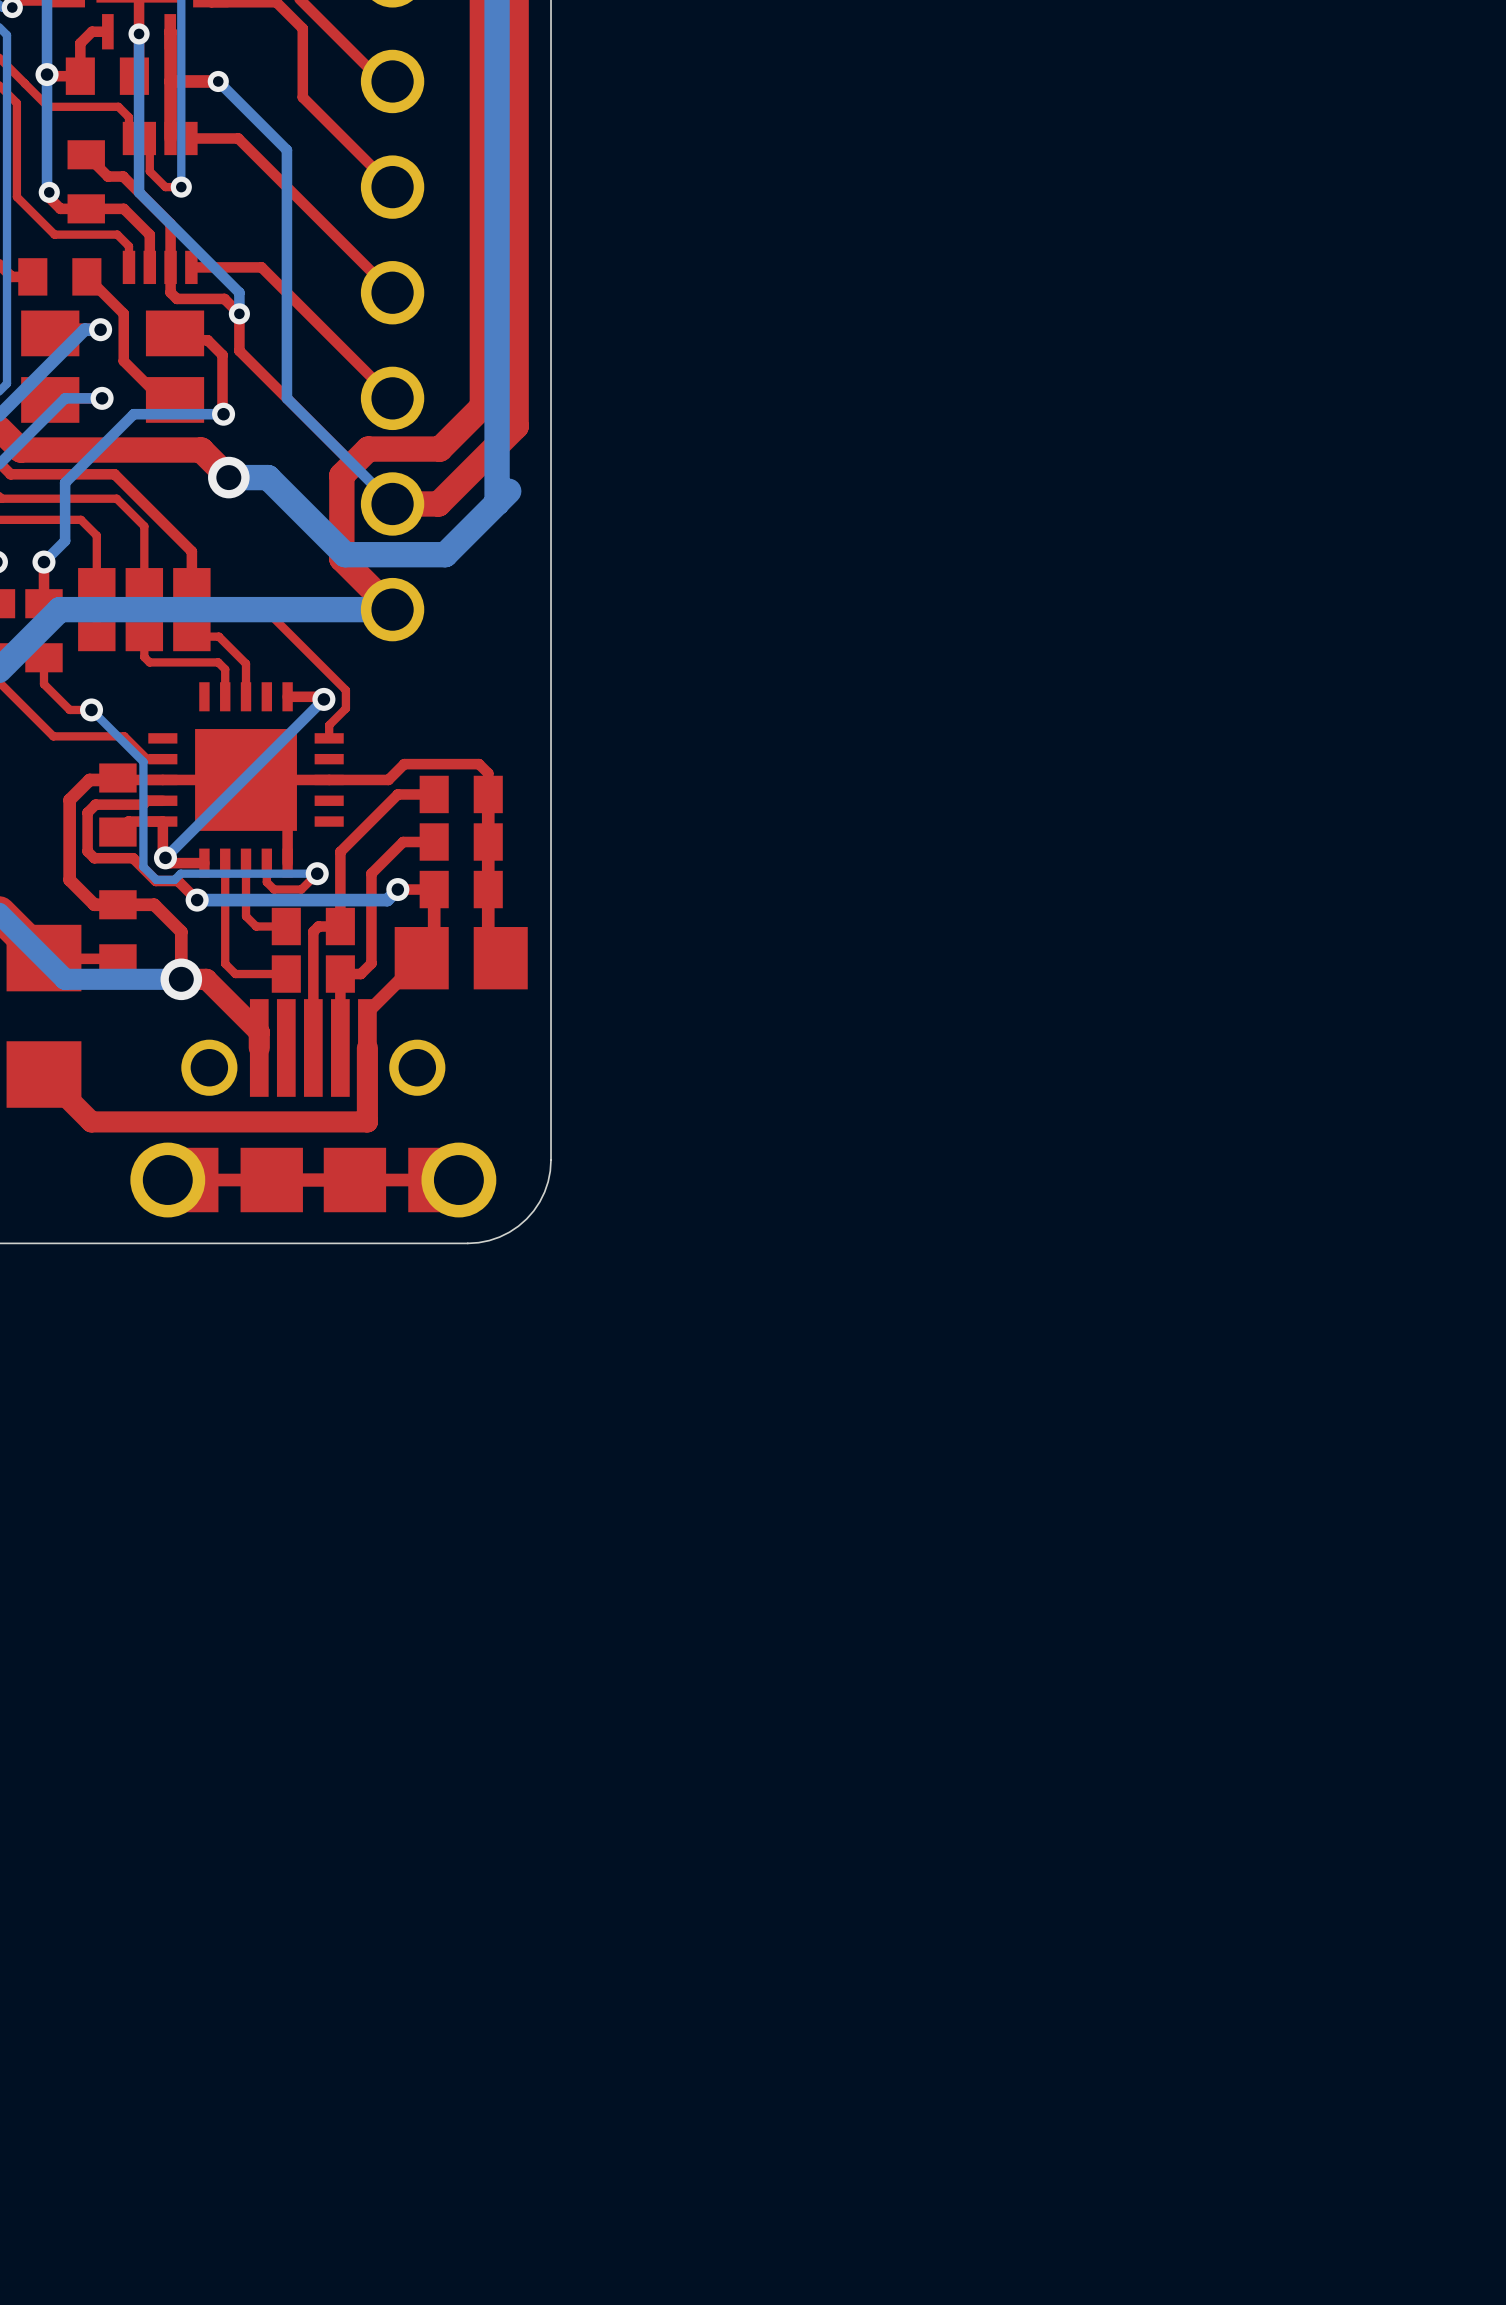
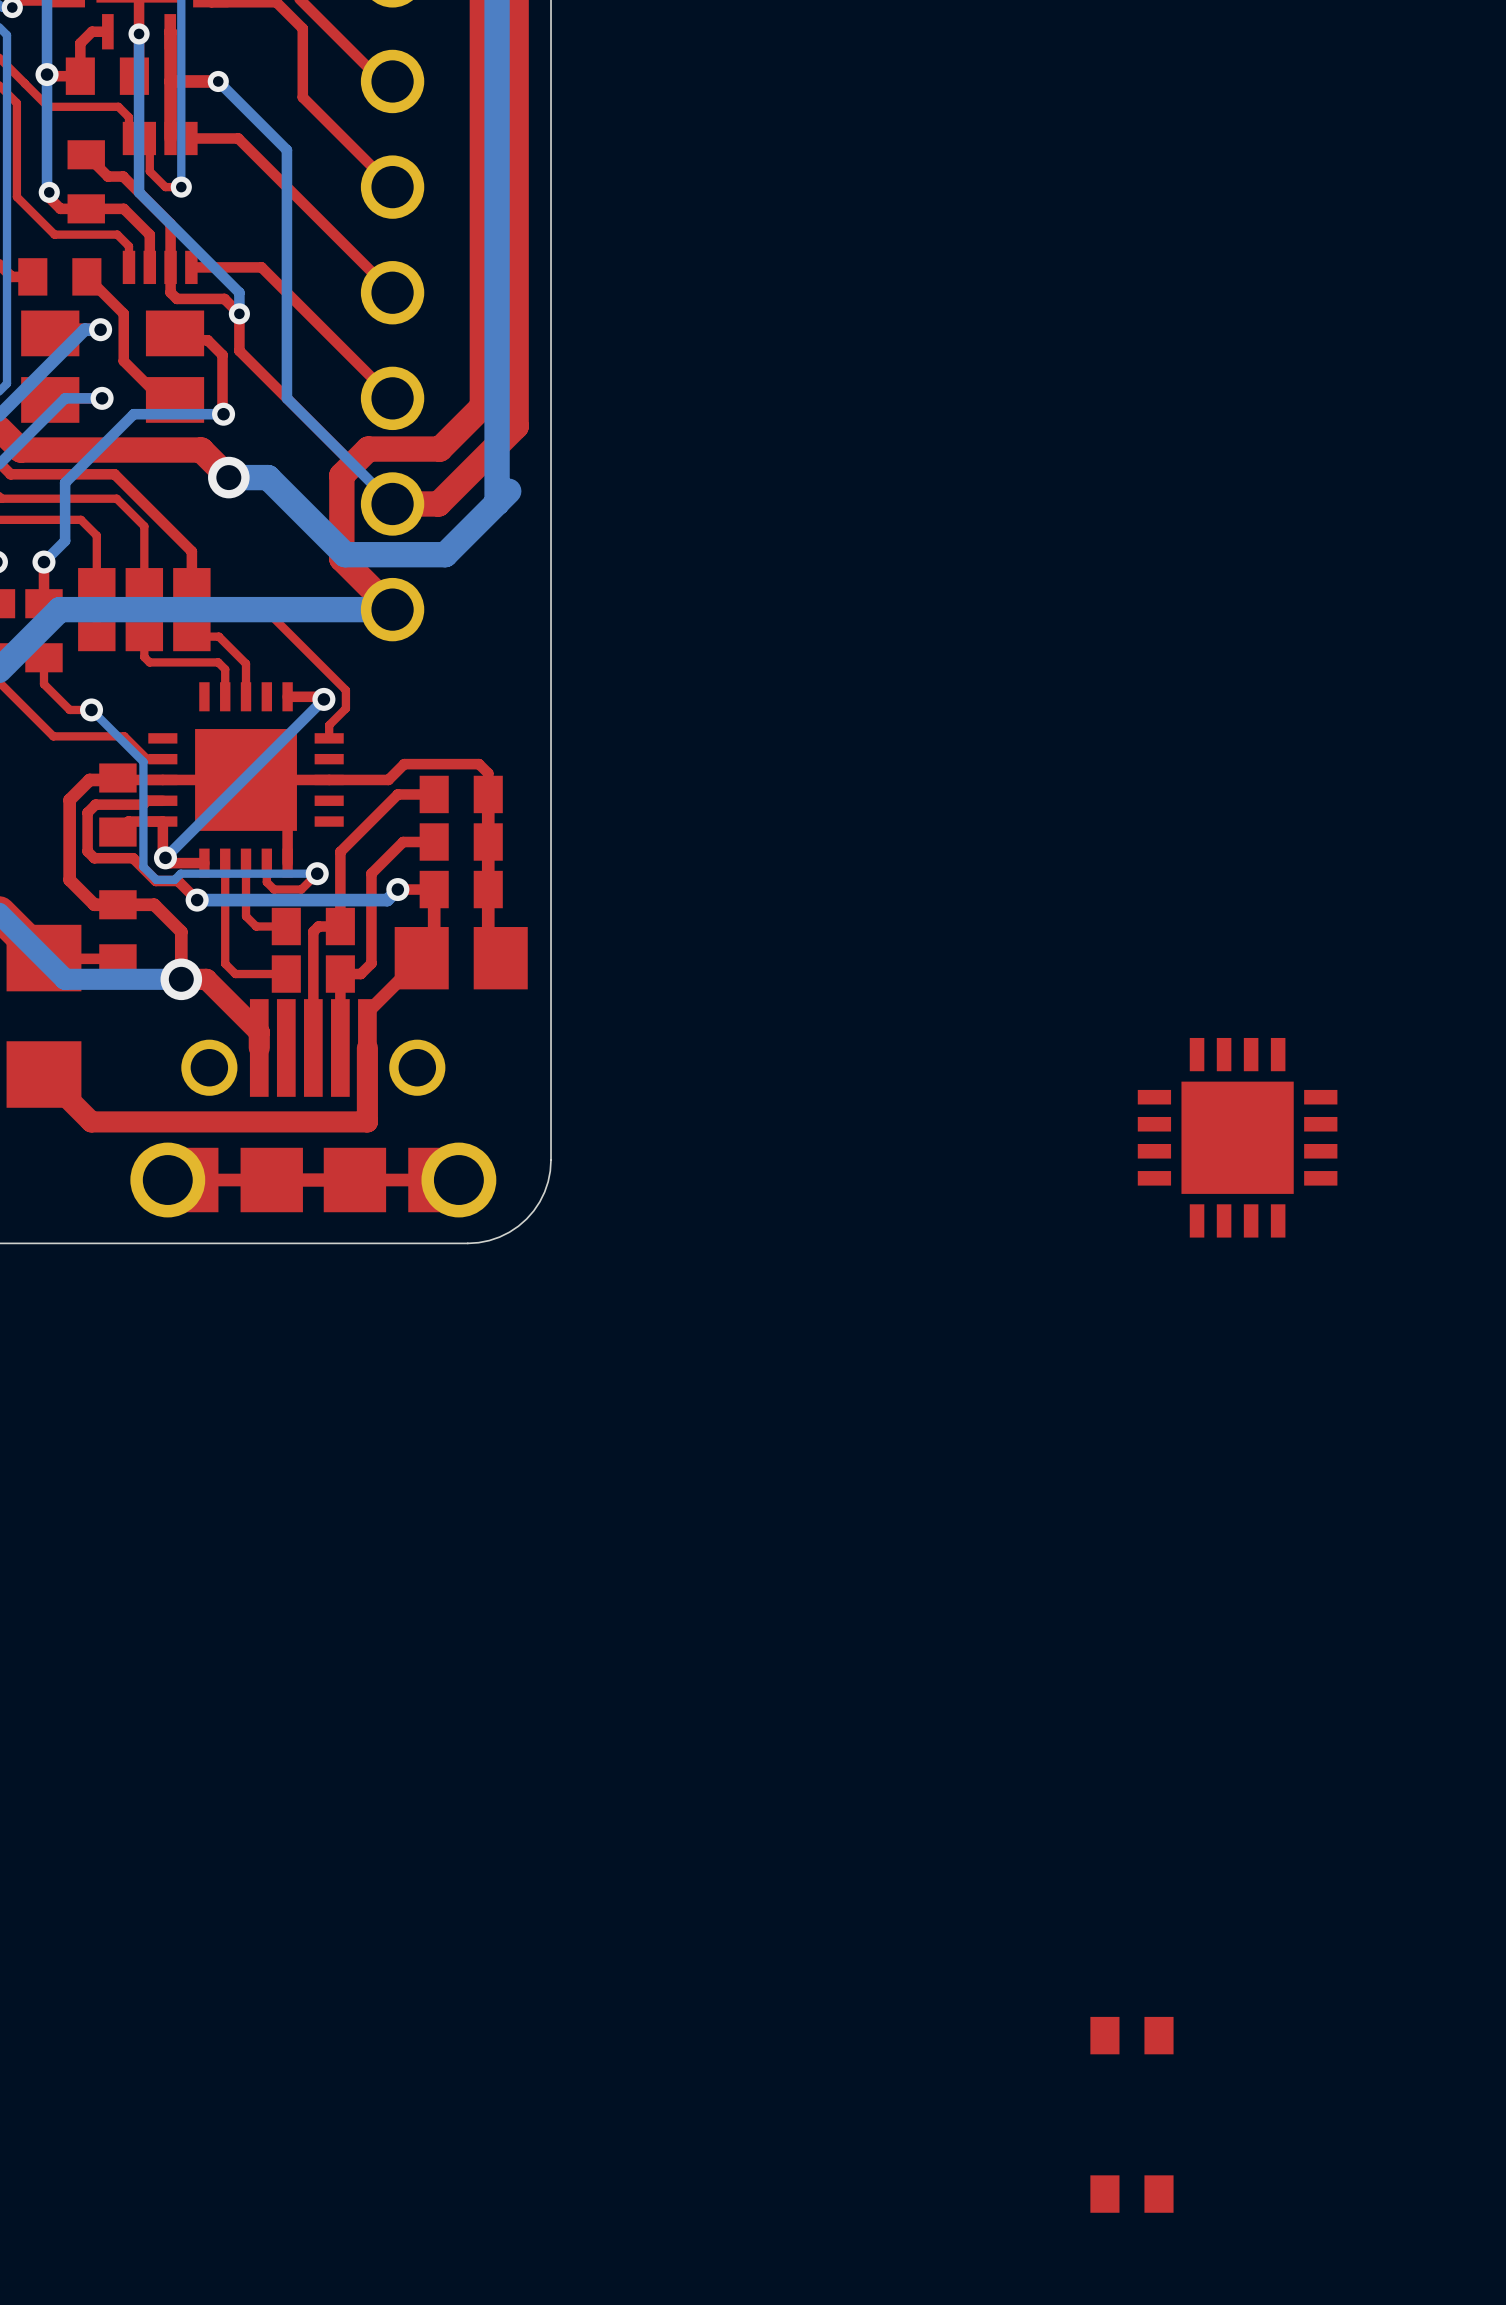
part: none -> (1237, 1137)
part: none -> (1131, 2035)
part: none -> (1131, 2194)

